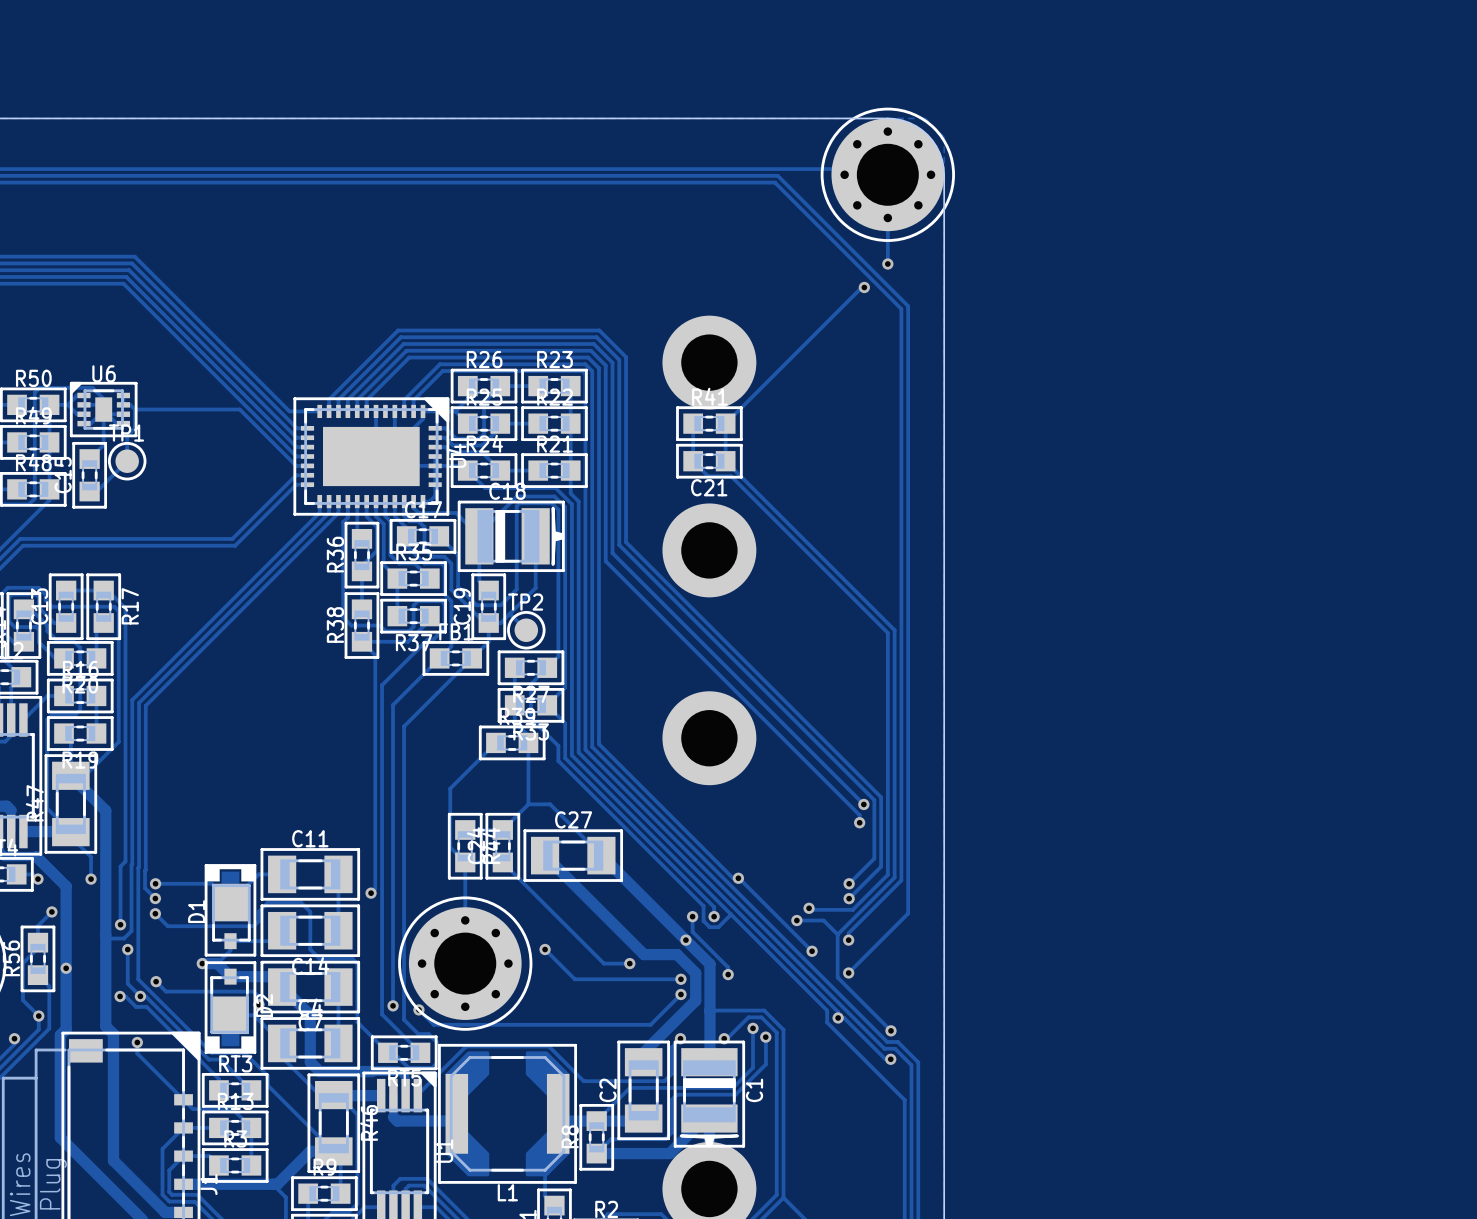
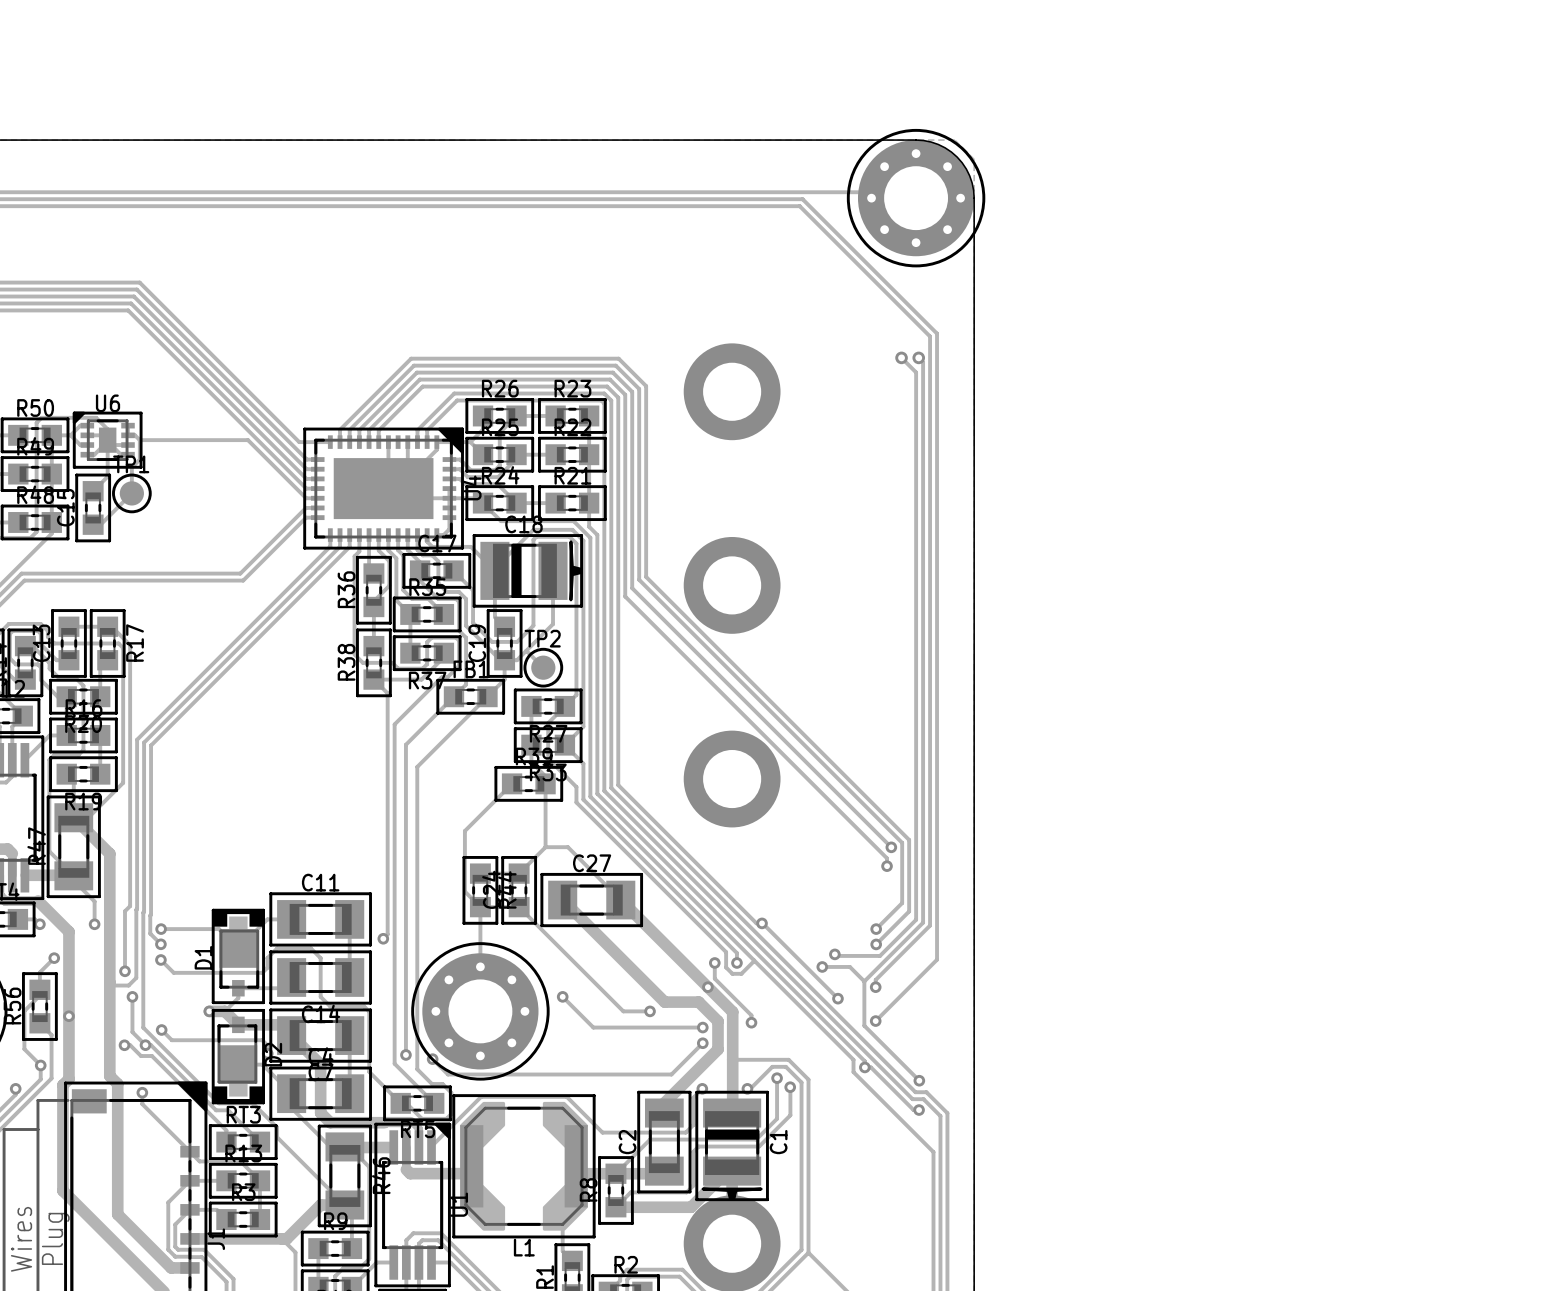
track: (887, 217) (887, 264) -> none
via: (887, 264) -> none
track: (864, 287) (861, 287) (725, 423) (725, 461) (894, 630) -> (918, 357) (923, 362) (923, 667)
via: (864, 287) -> none
via: none -> (901, 357)
via: none -> (918, 357)
track: (693, 423) (693, 461) (708, 476) (731, 476) (887, 632) -> (901, 357) (916, 372) (916, 670)
part: (709, 423) -> none
C21: (709, 461) -> none

